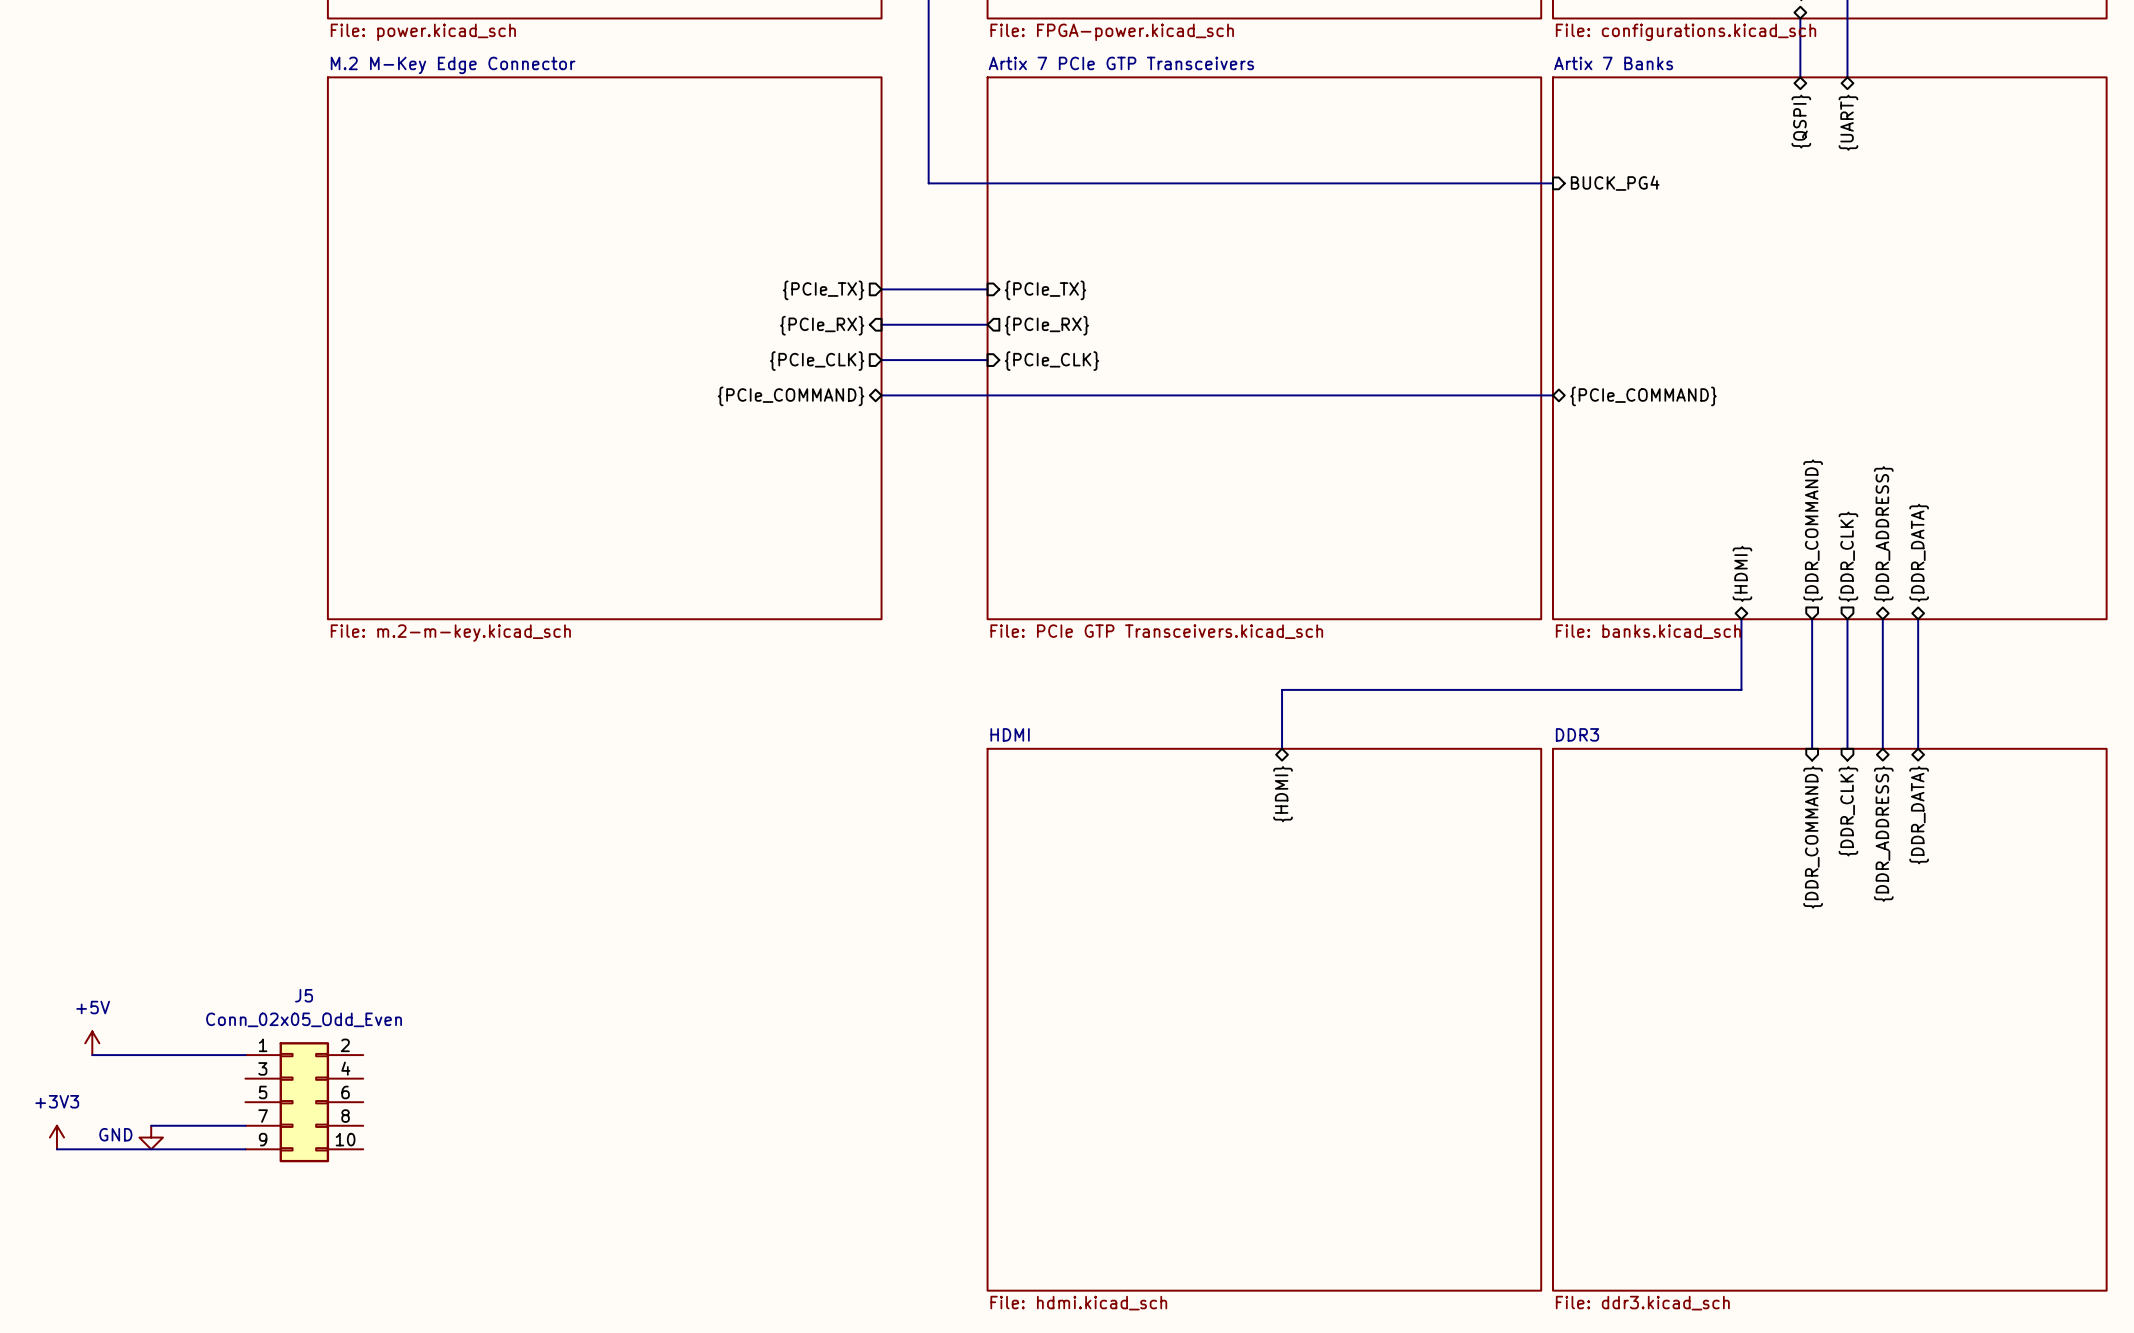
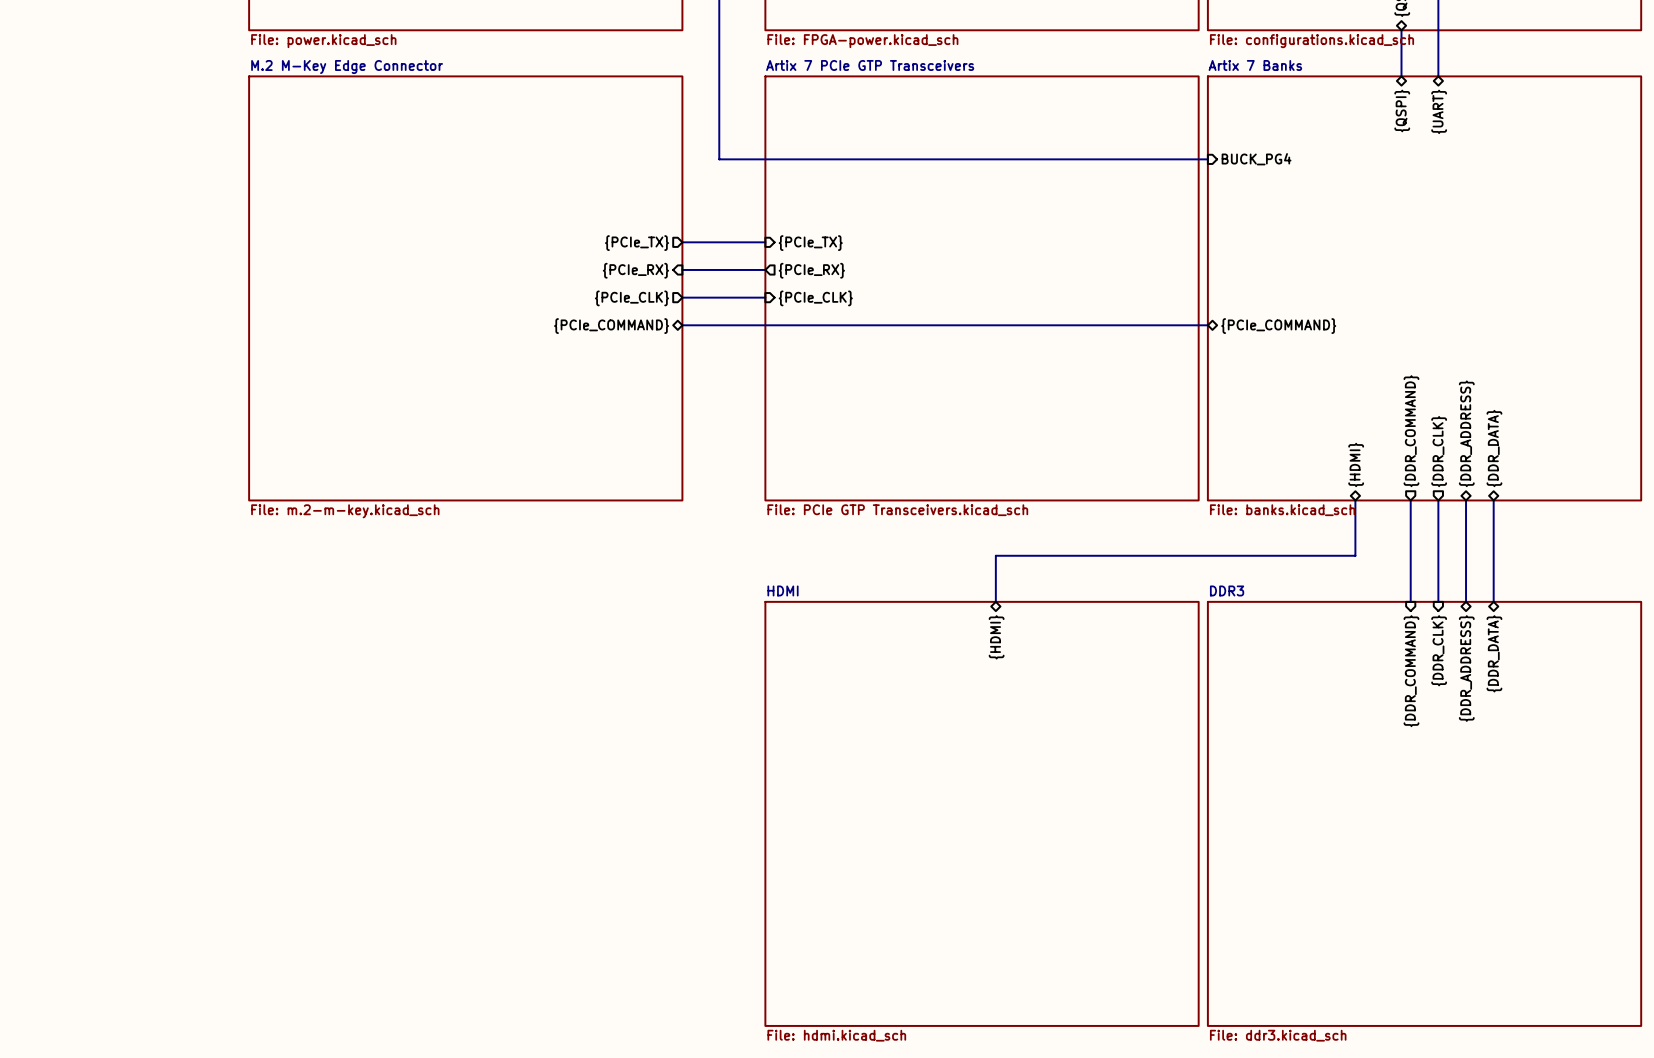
power symbol: +5V (92, 1043) -> none
wire: (92, 1055) (245, 1055) -> none
J5: Conn_02x05_Odd_Even (304, 1102) -> none
wire: (151, 1125) (245, 1125) -> none
power symbol: +3V3 (56, 1137) -> none
power symbol: GND (151, 1137) -> none
wire: (56, 1149) (245, 1149) -> none

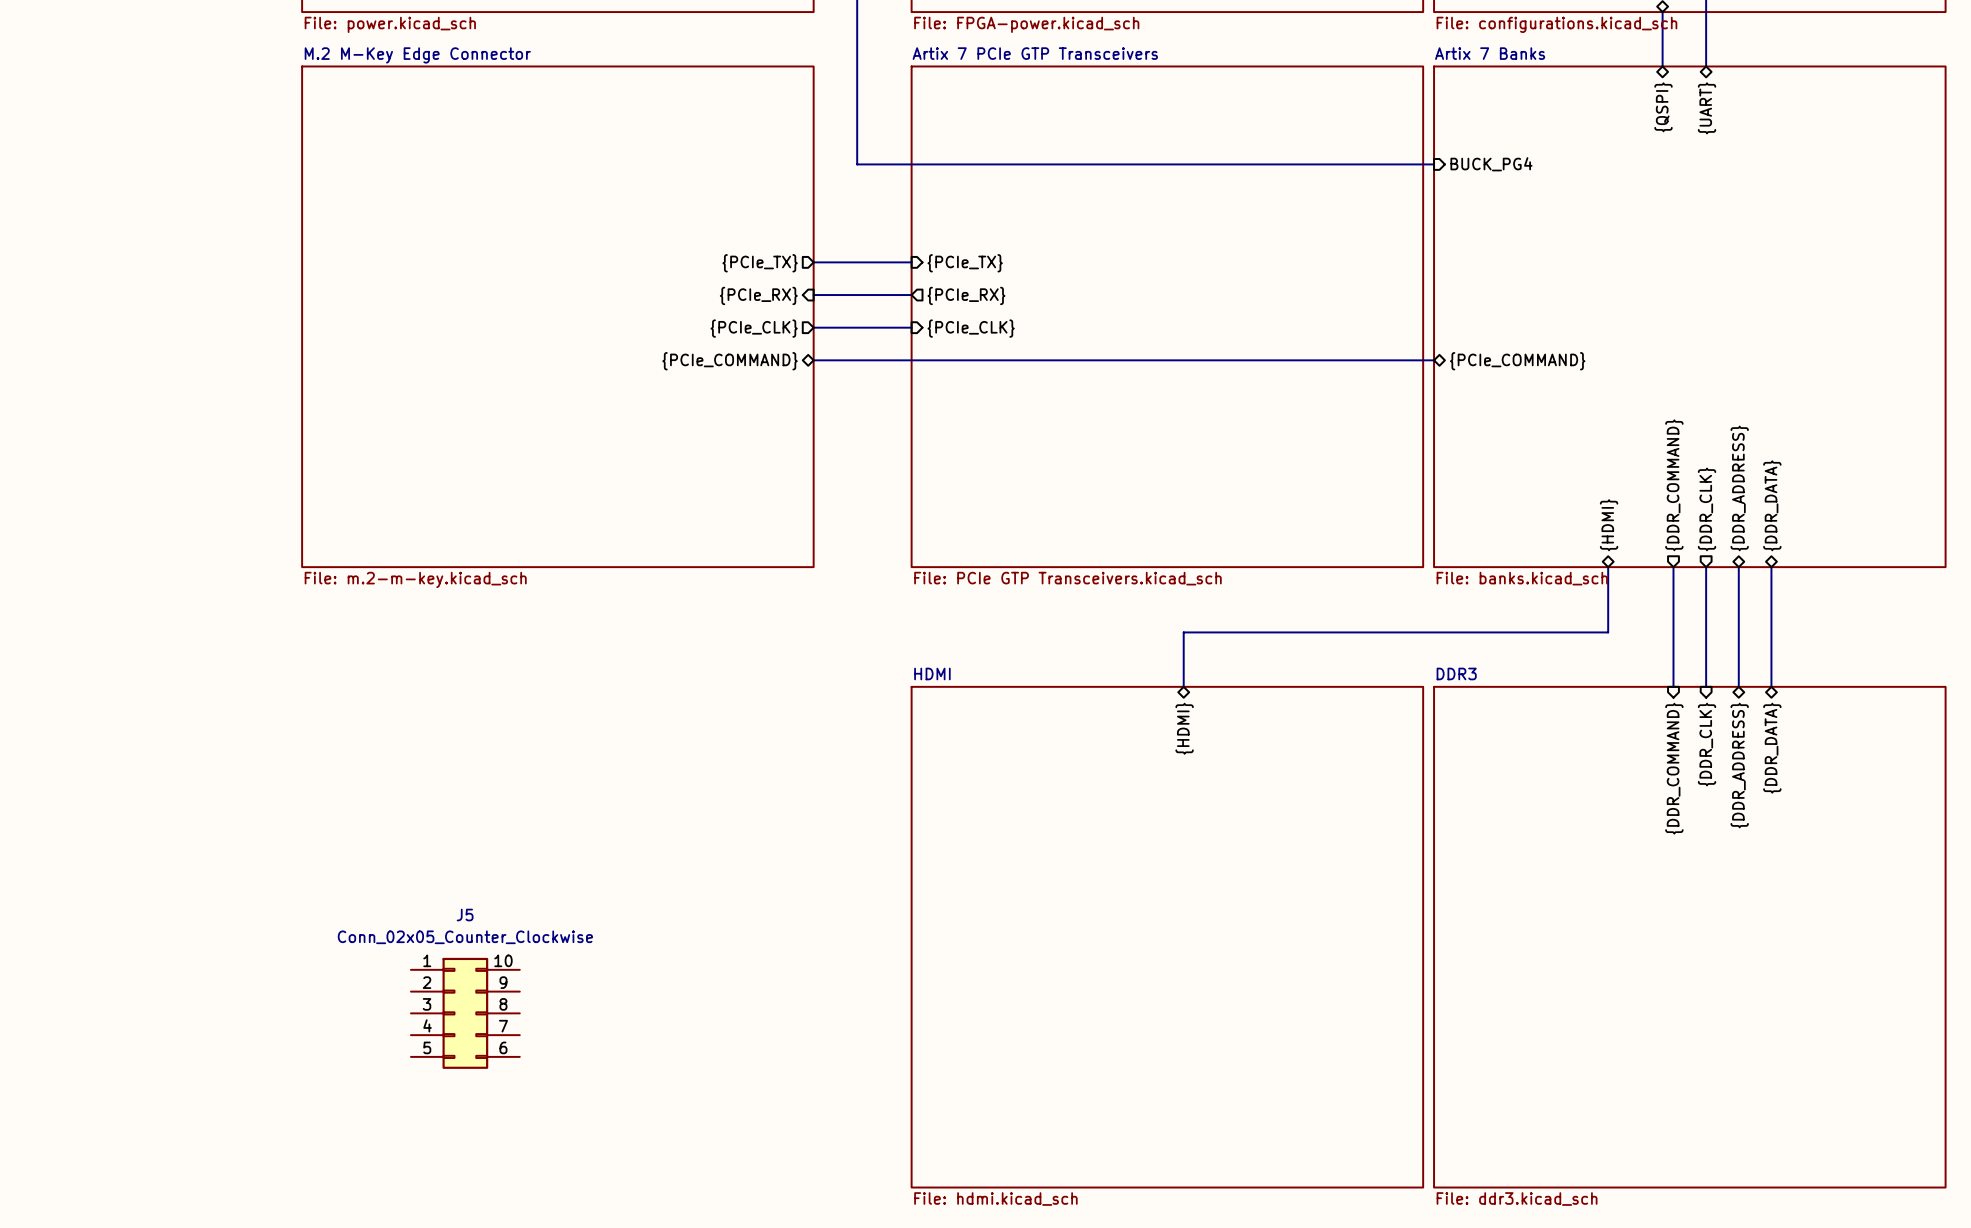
J5: none -> Conn_02x05_Counter_Clockwise (465, 1013)

